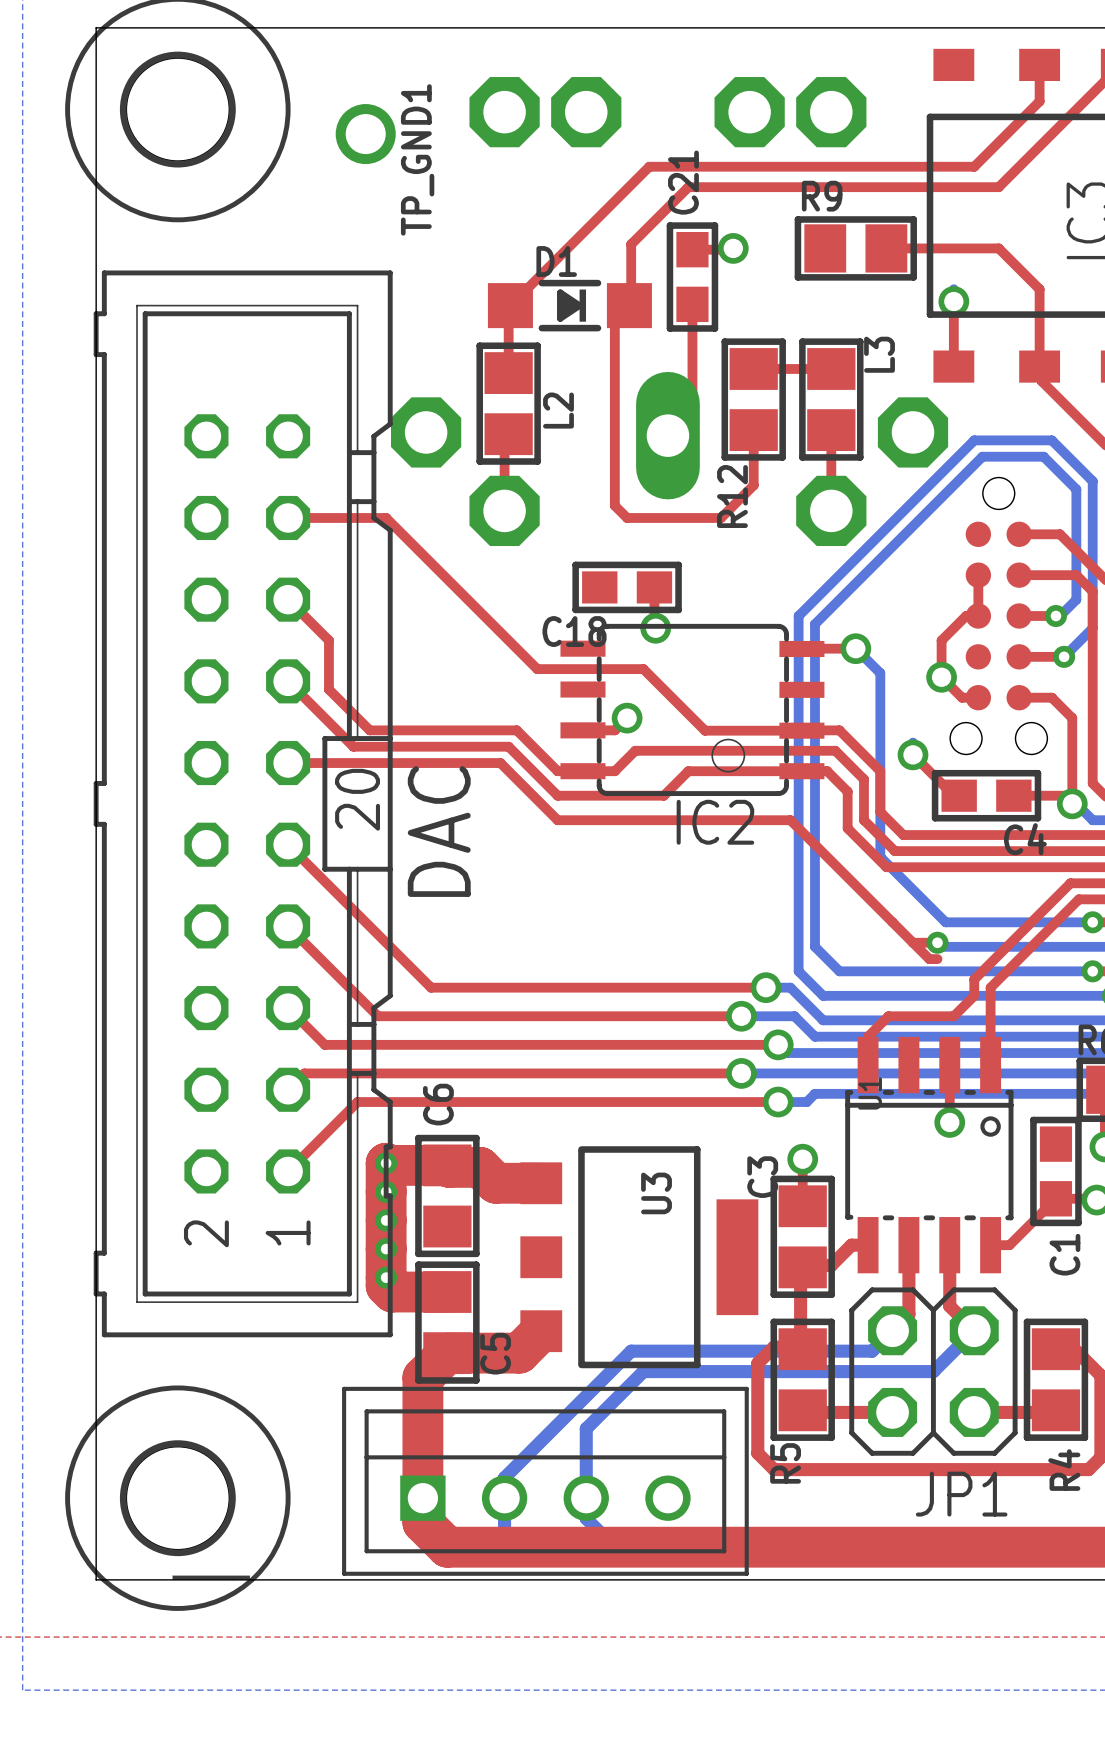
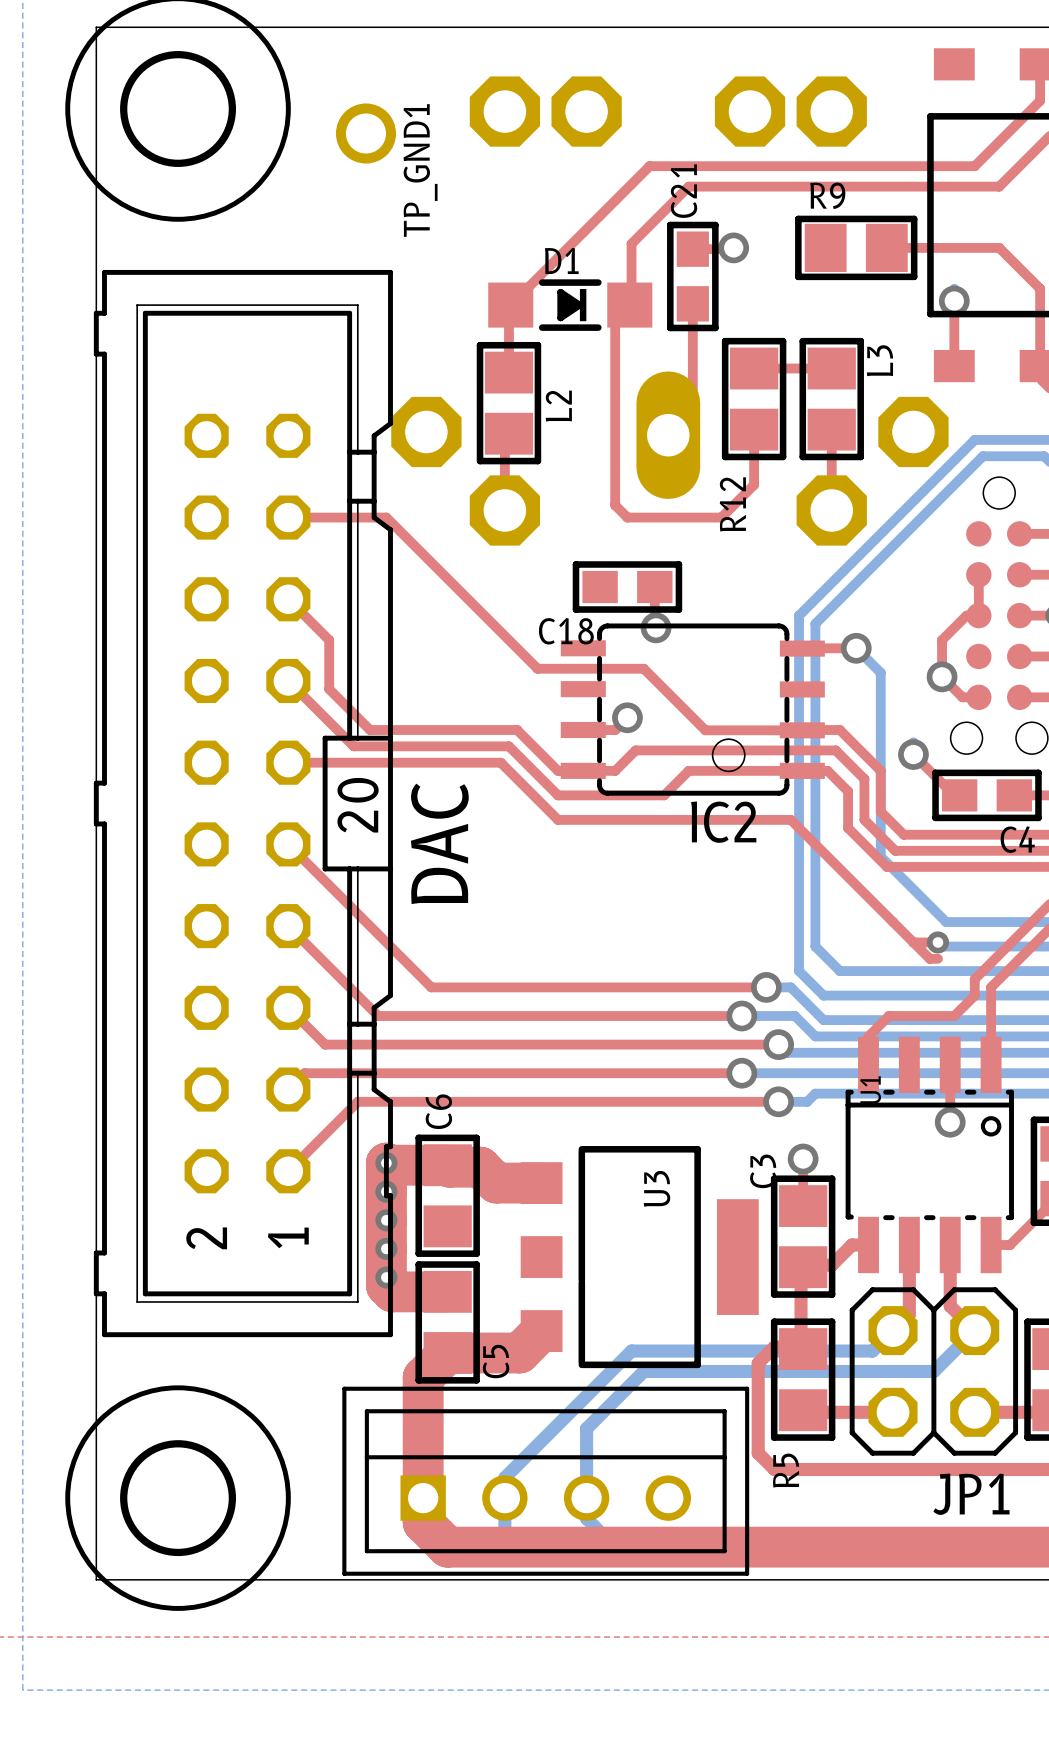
drawing: [172, 1575, 250, 1581] -> none

